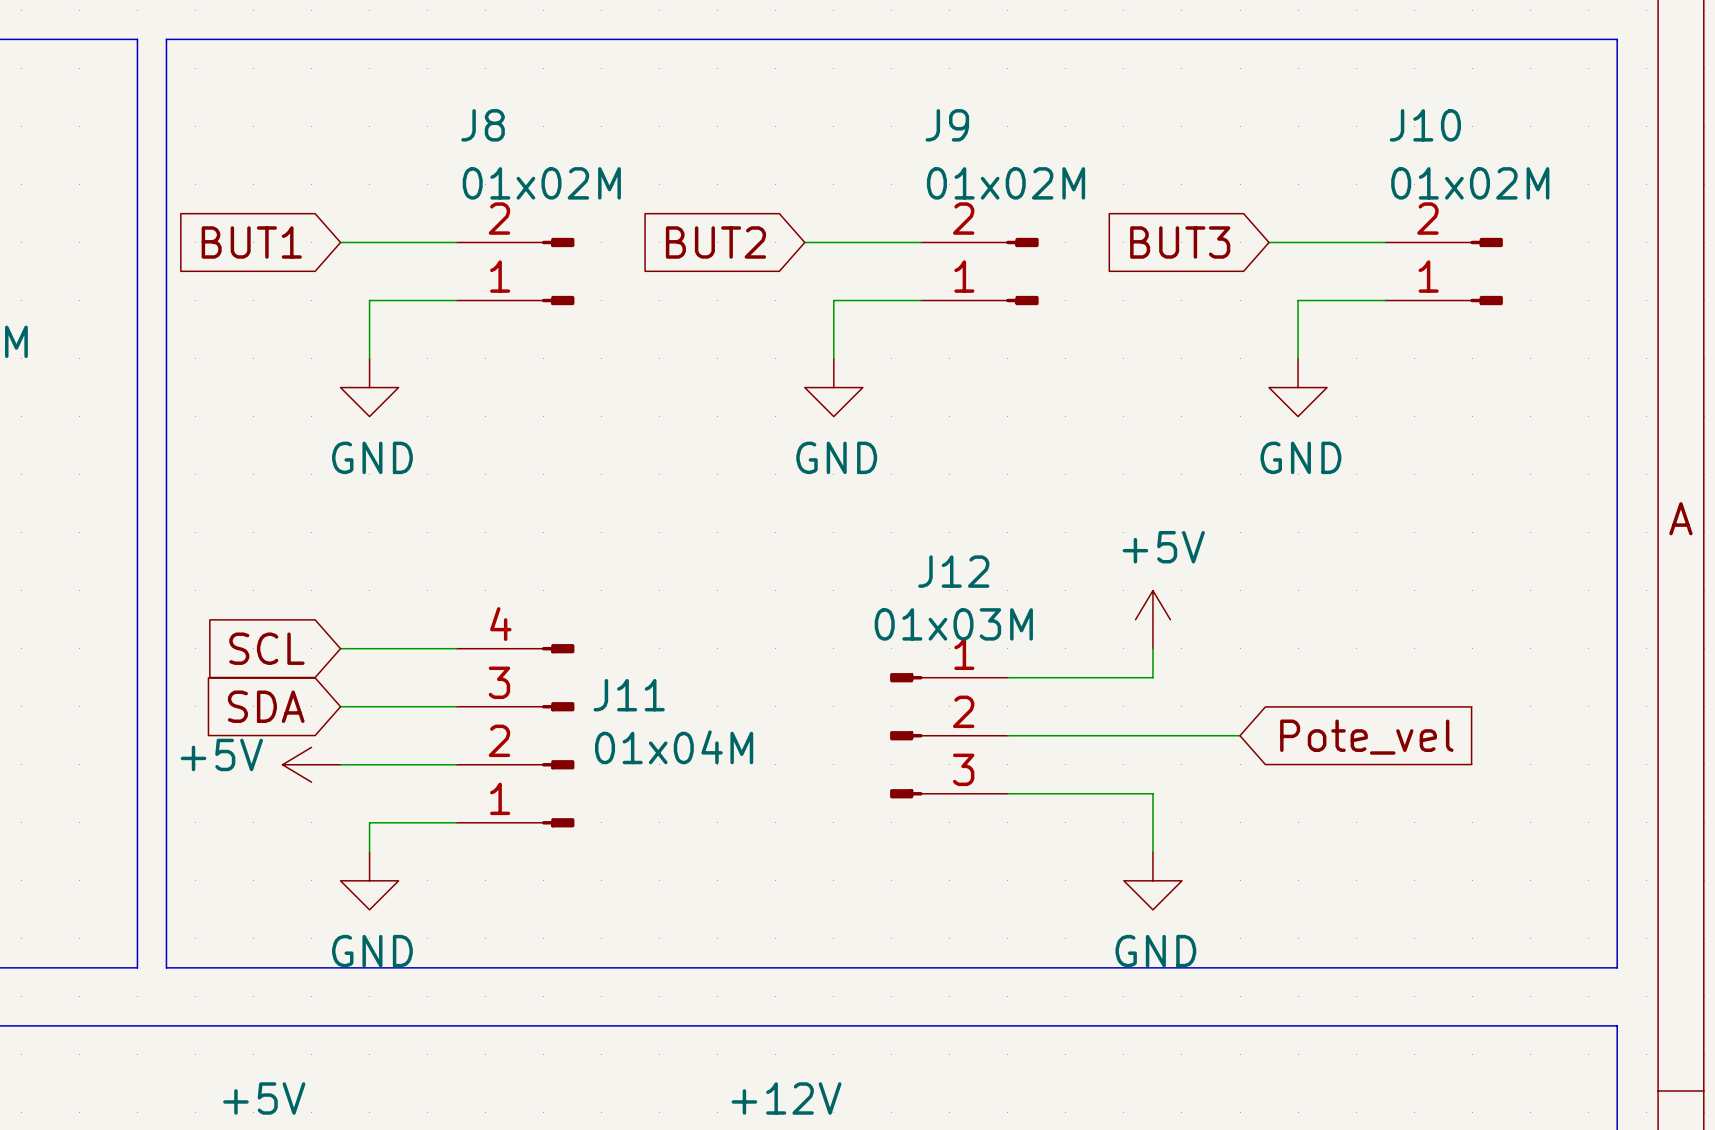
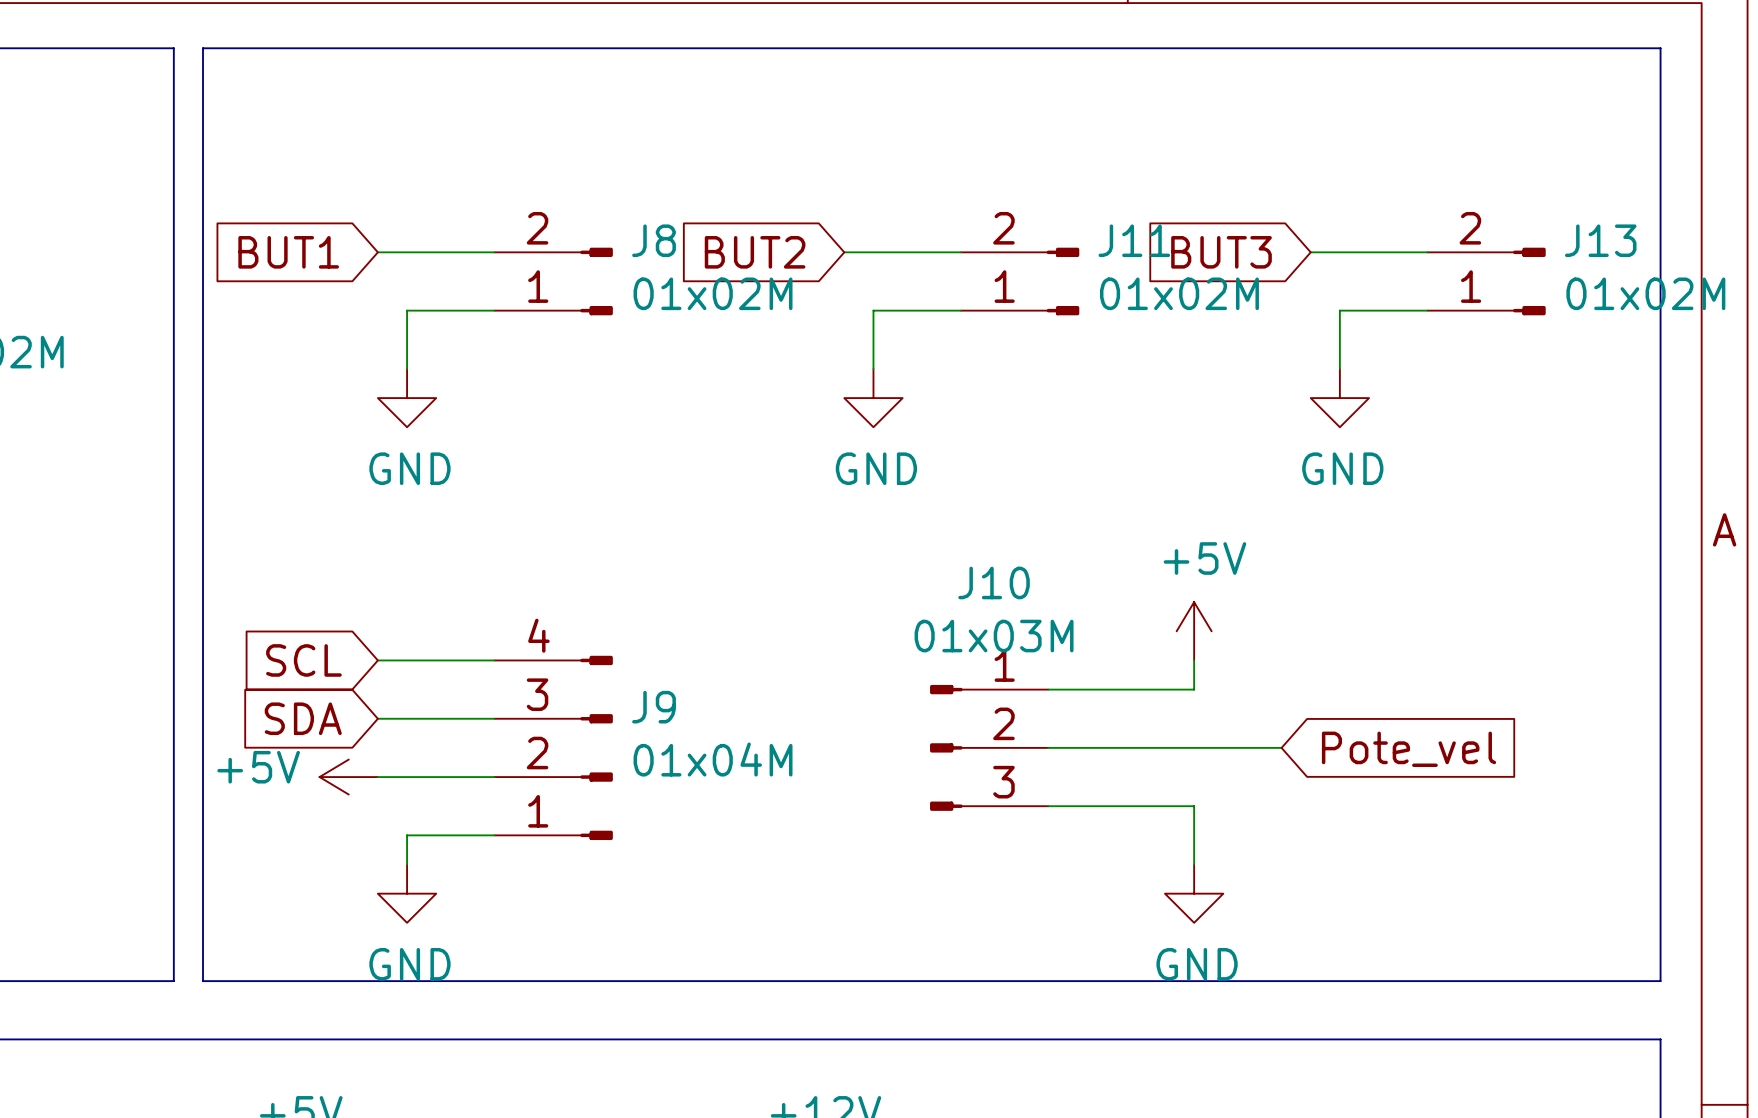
J8 name position: J8 (483, 125) -> J8 (654, 240)
J9 name: J9 (947, 125) -> J11 (1134, 240)
J10 name: J10 (1425, 125) -> J13 (1600, 240)
J8 value position: 01x02M (541, 183) -> 01x02M (713, 293)
J9 value position: 01x02M (1006, 183) -> 01x02M (1179, 293)
J10 value position: 01x02M (1470, 183) -> 01x02M (1645, 293)
J12 name: J12 (953, 571) -> J10 (994, 582)
J11 name: J11 (629, 695) -> J9 (654, 707)

